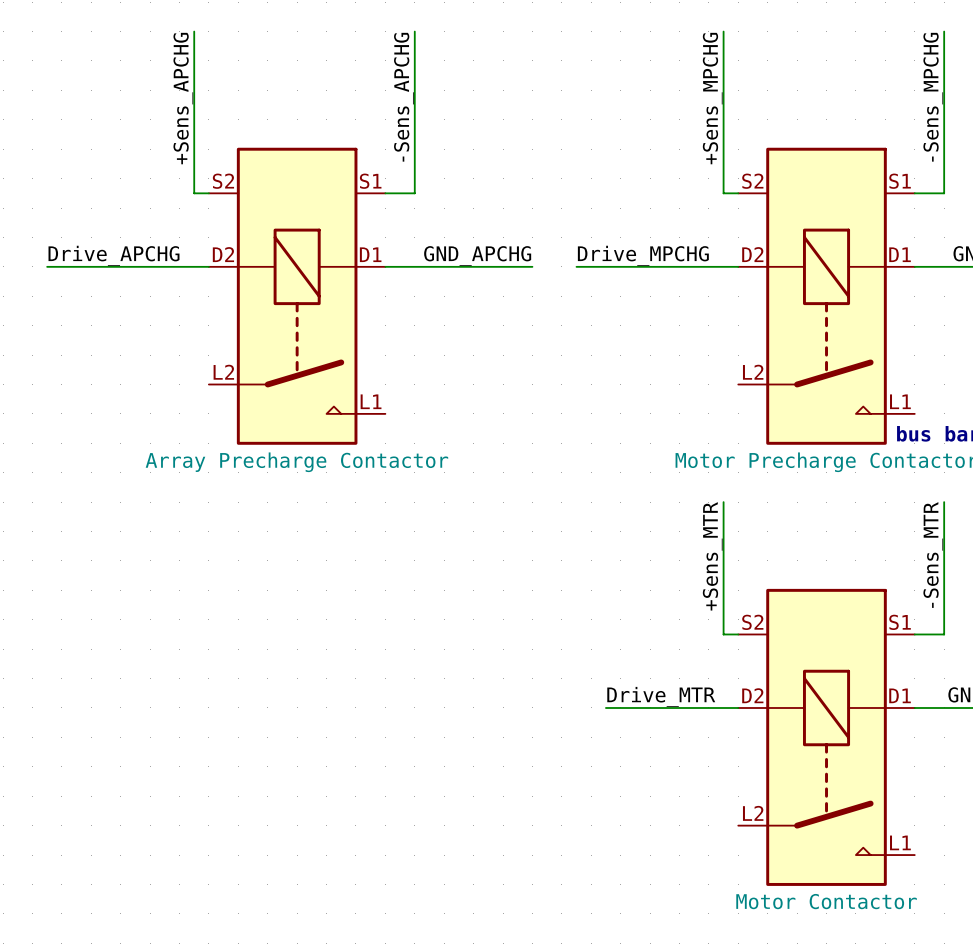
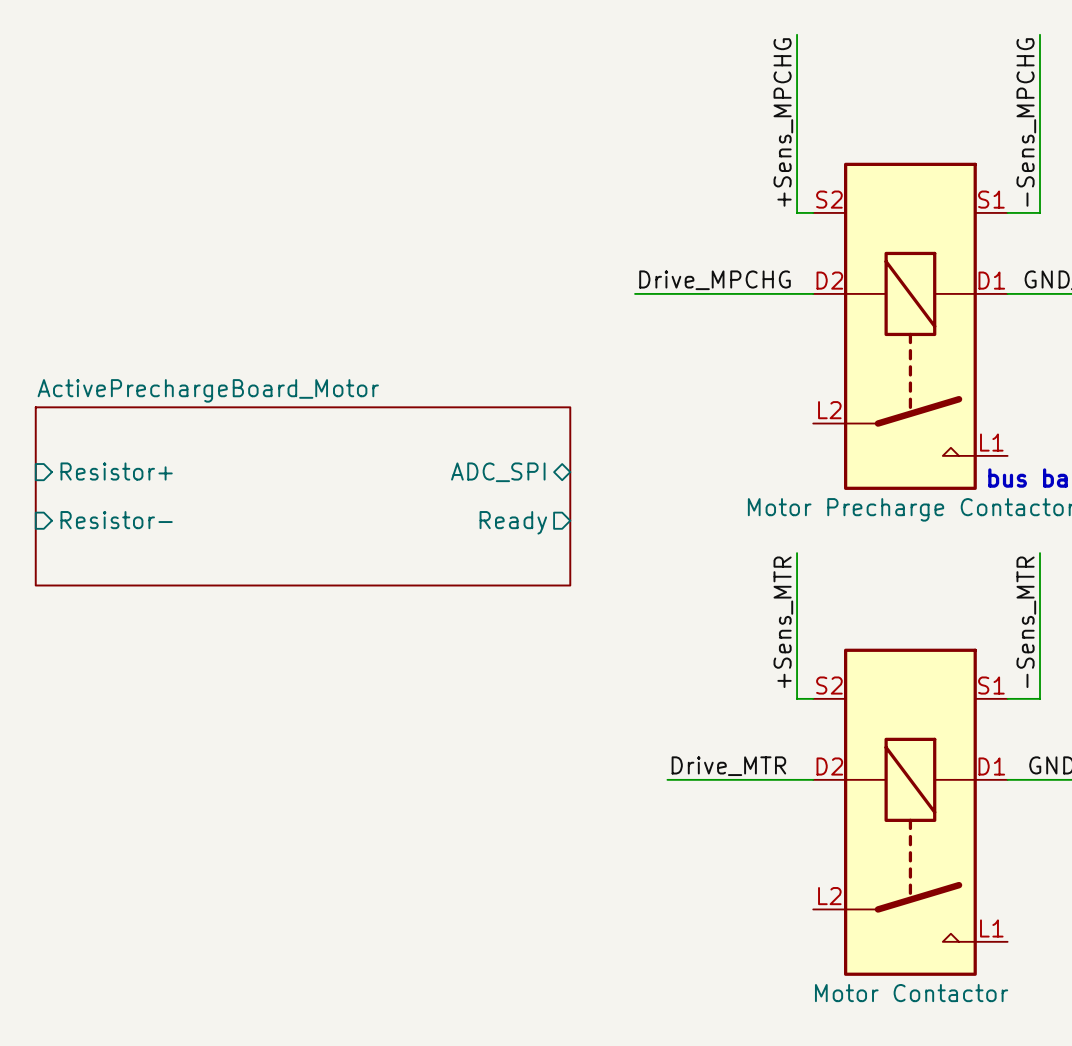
wire: (194, 31) (194, 193) (208, 193) -> none
wire: (414, 31) (414, 193) (385, 193) -> none
label: -Sens_APCHG (403, 97) -> none
label: +Sens_APCHG (183, 98) -> none
label: Drive_APCHG (113, 255) -> none
label: GND_APCHG (477, 255) -> none
wire: (47, 266) (208, 266) -> none
wire: (385, 266) (532, 266) -> none
part: Array Precharge Contactor (297, 296) -> none
sheet pin: none -> Resistor+ (116, 471)
sheet pin: none -> ADC_SPI (498, 472)
sheet ActivePrechargeBoard_Motor: none -> (303, 496)
sheet pin: none -> Resistor- (116, 520)
sheet pin: none -> Ready (513, 522)

